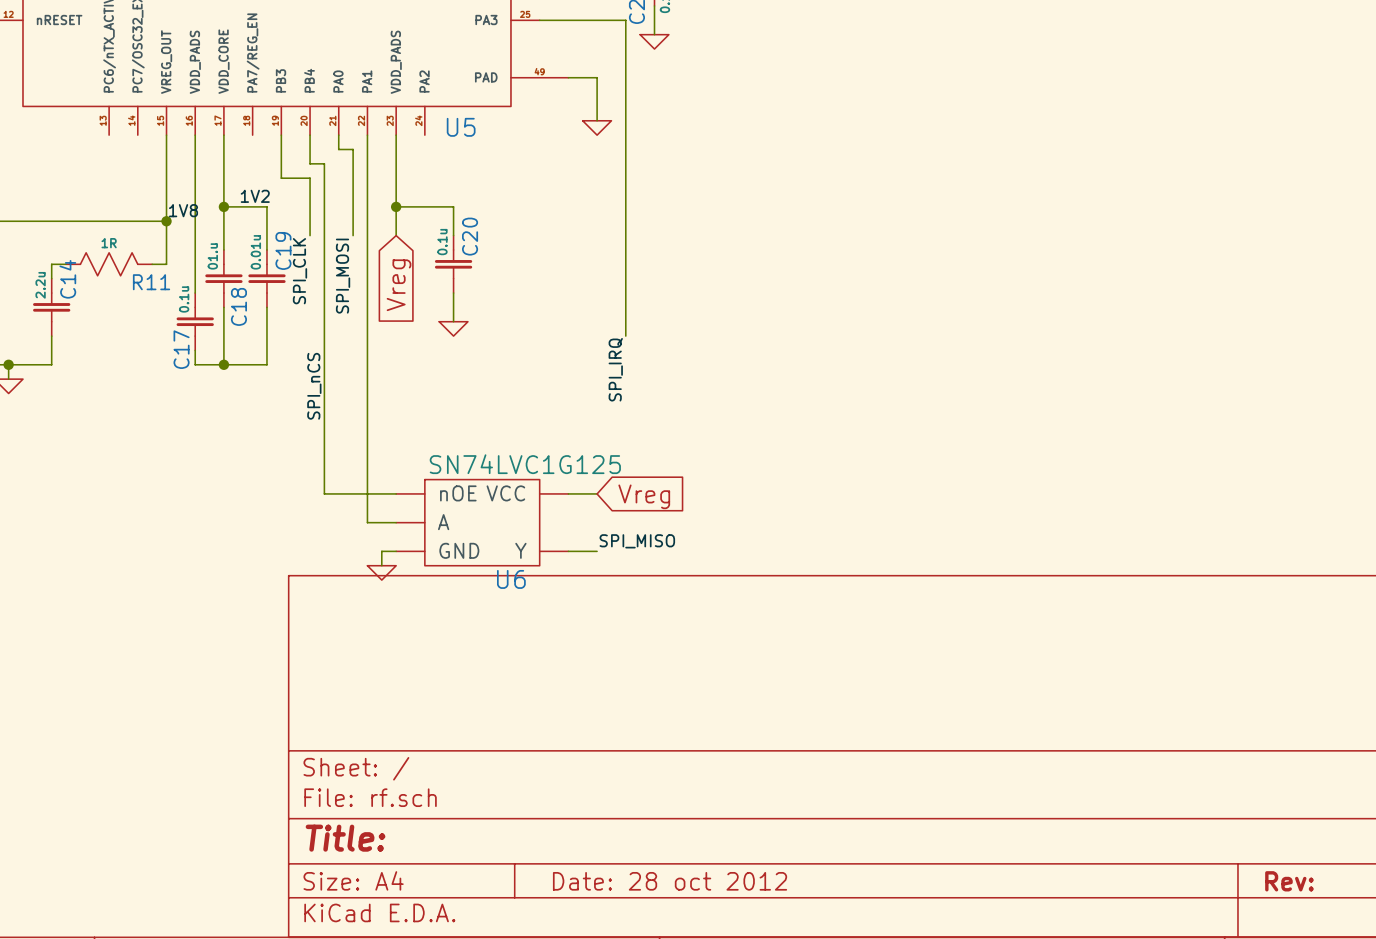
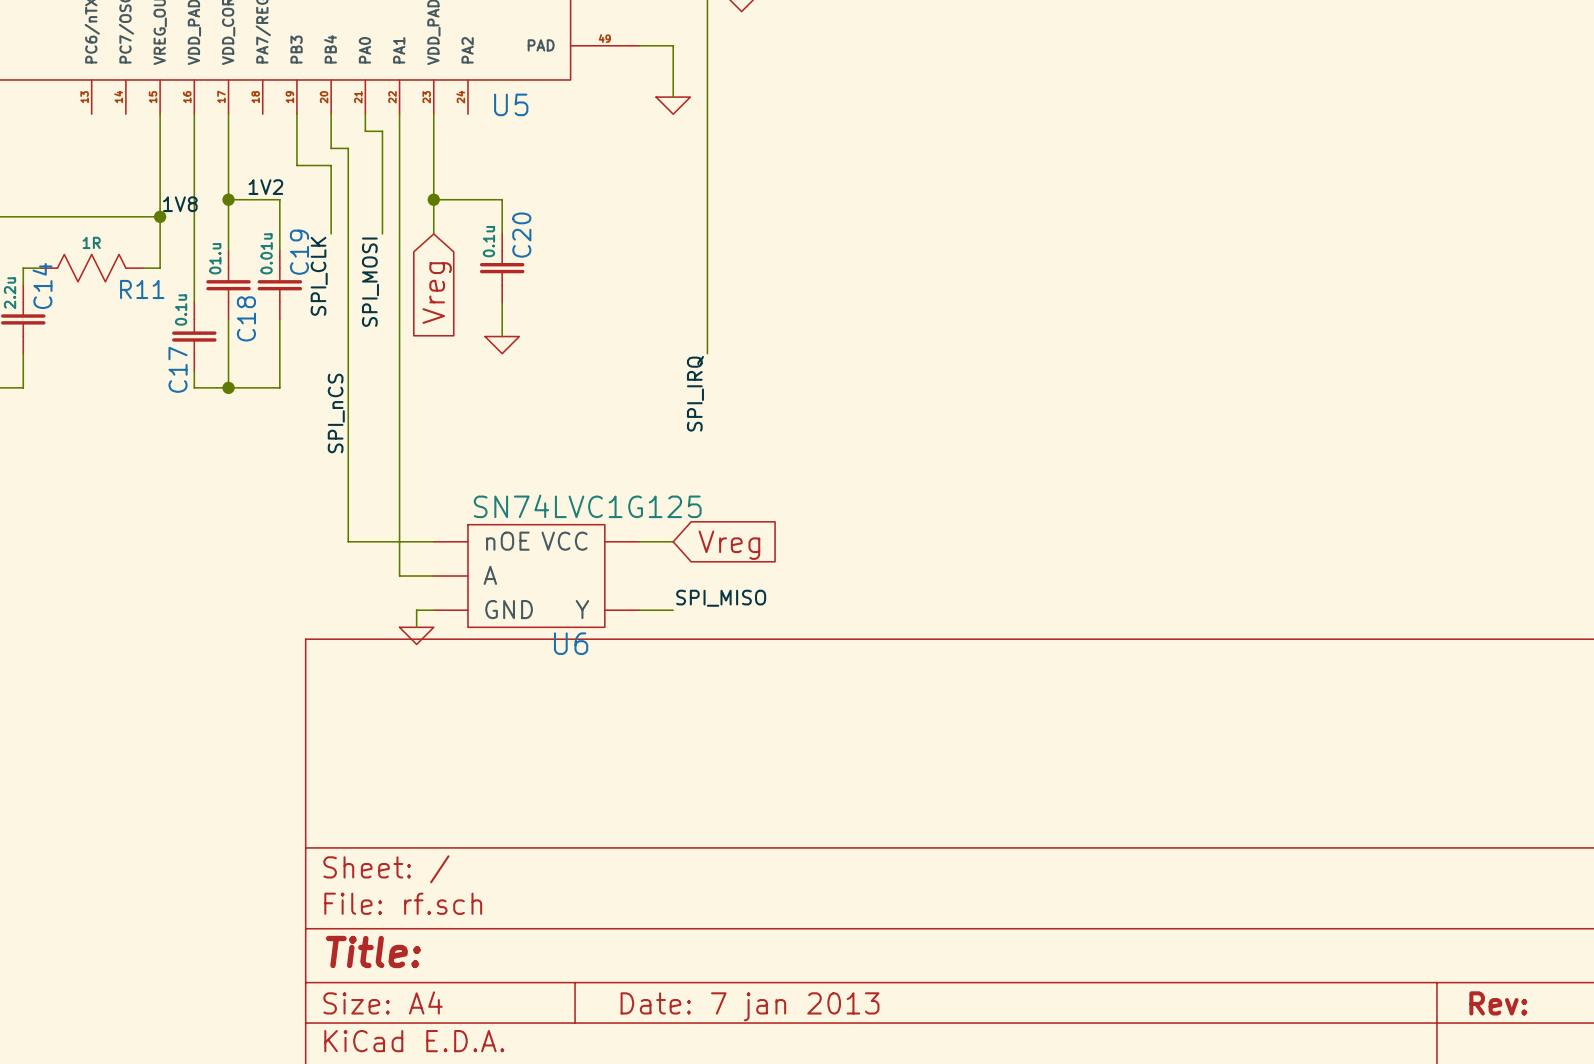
title block: Date: 28 oct 2012 (670, 881) -> Date: 7 jan 2013 (750, 1006)

